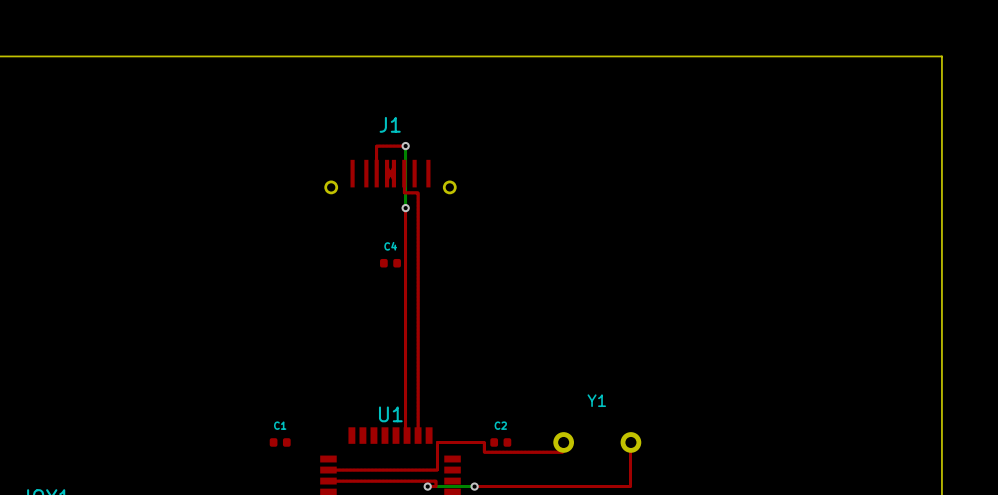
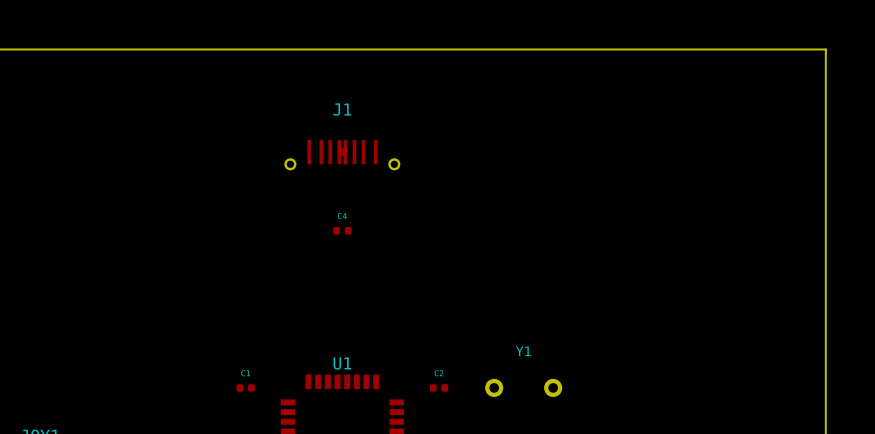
top track: (405, 146) (376, 146) (376, 166) -> none
bottom track: (405, 146) (405, 208) -> none
via: (405, 146) -> none
top track: (404, 180) (404, 192) (418, 192) (418, 435) -> none
top track: (405, 208) (407, 435) -> none
via: (405, 208) -> none
top track: (563, 442) (562, 452) (484, 452) (484, 442) (437, 442) (437, 470) (328, 470) -> none
top track: (630, 442) (630, 486) (474, 486) -> none
top track: (328, 481) (435, 481) (435, 486) (427, 486) -> none
bottom track: (427, 486) (474, 486) -> none
via: (427, 486) -> none
via: (474, 486) -> none

